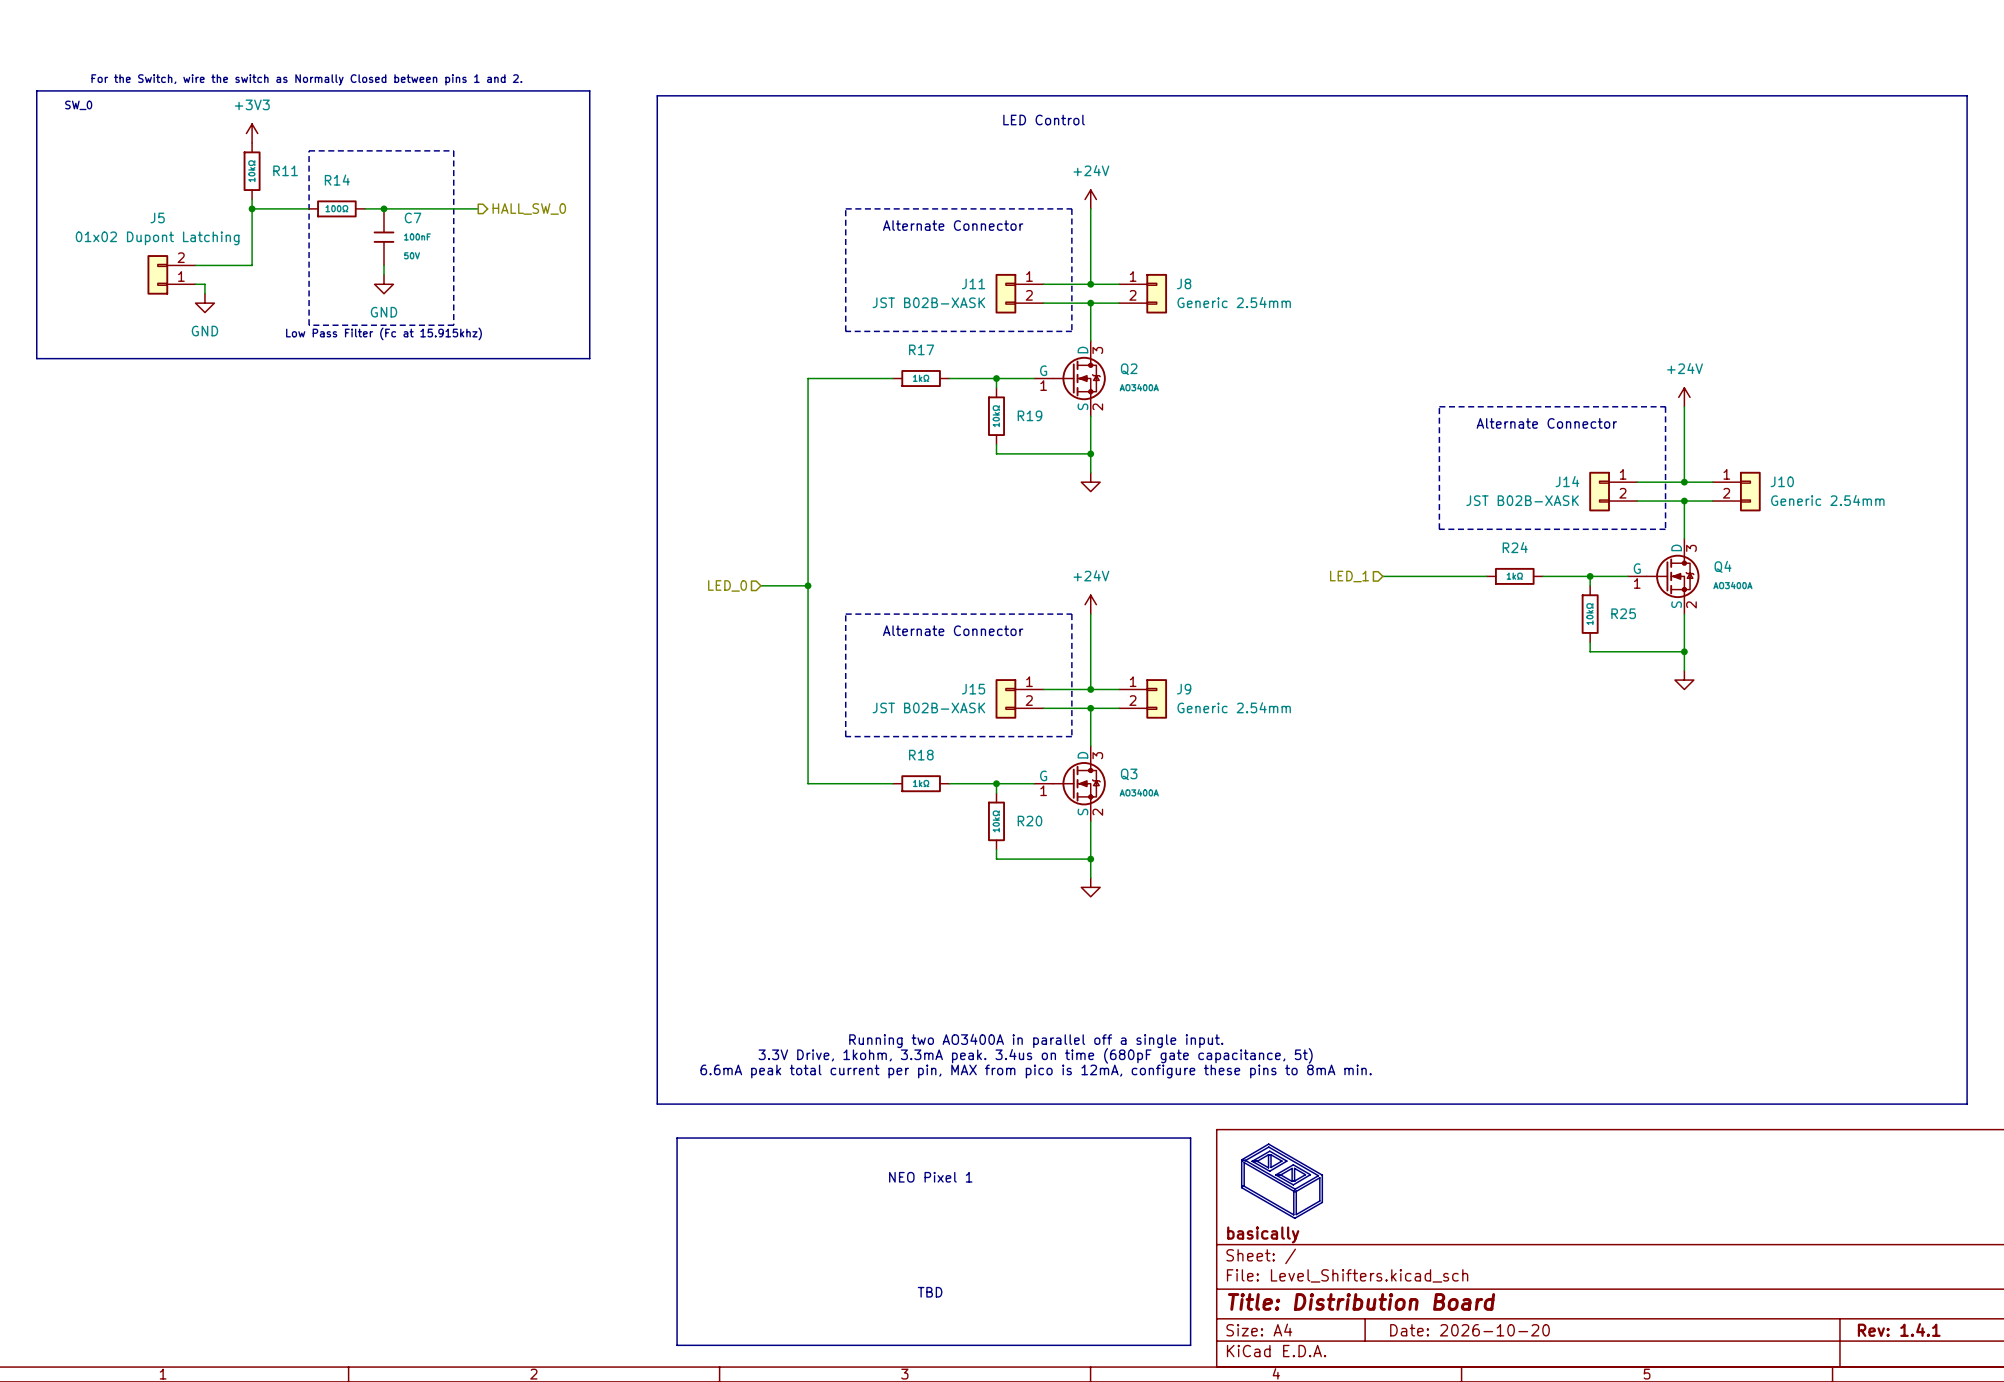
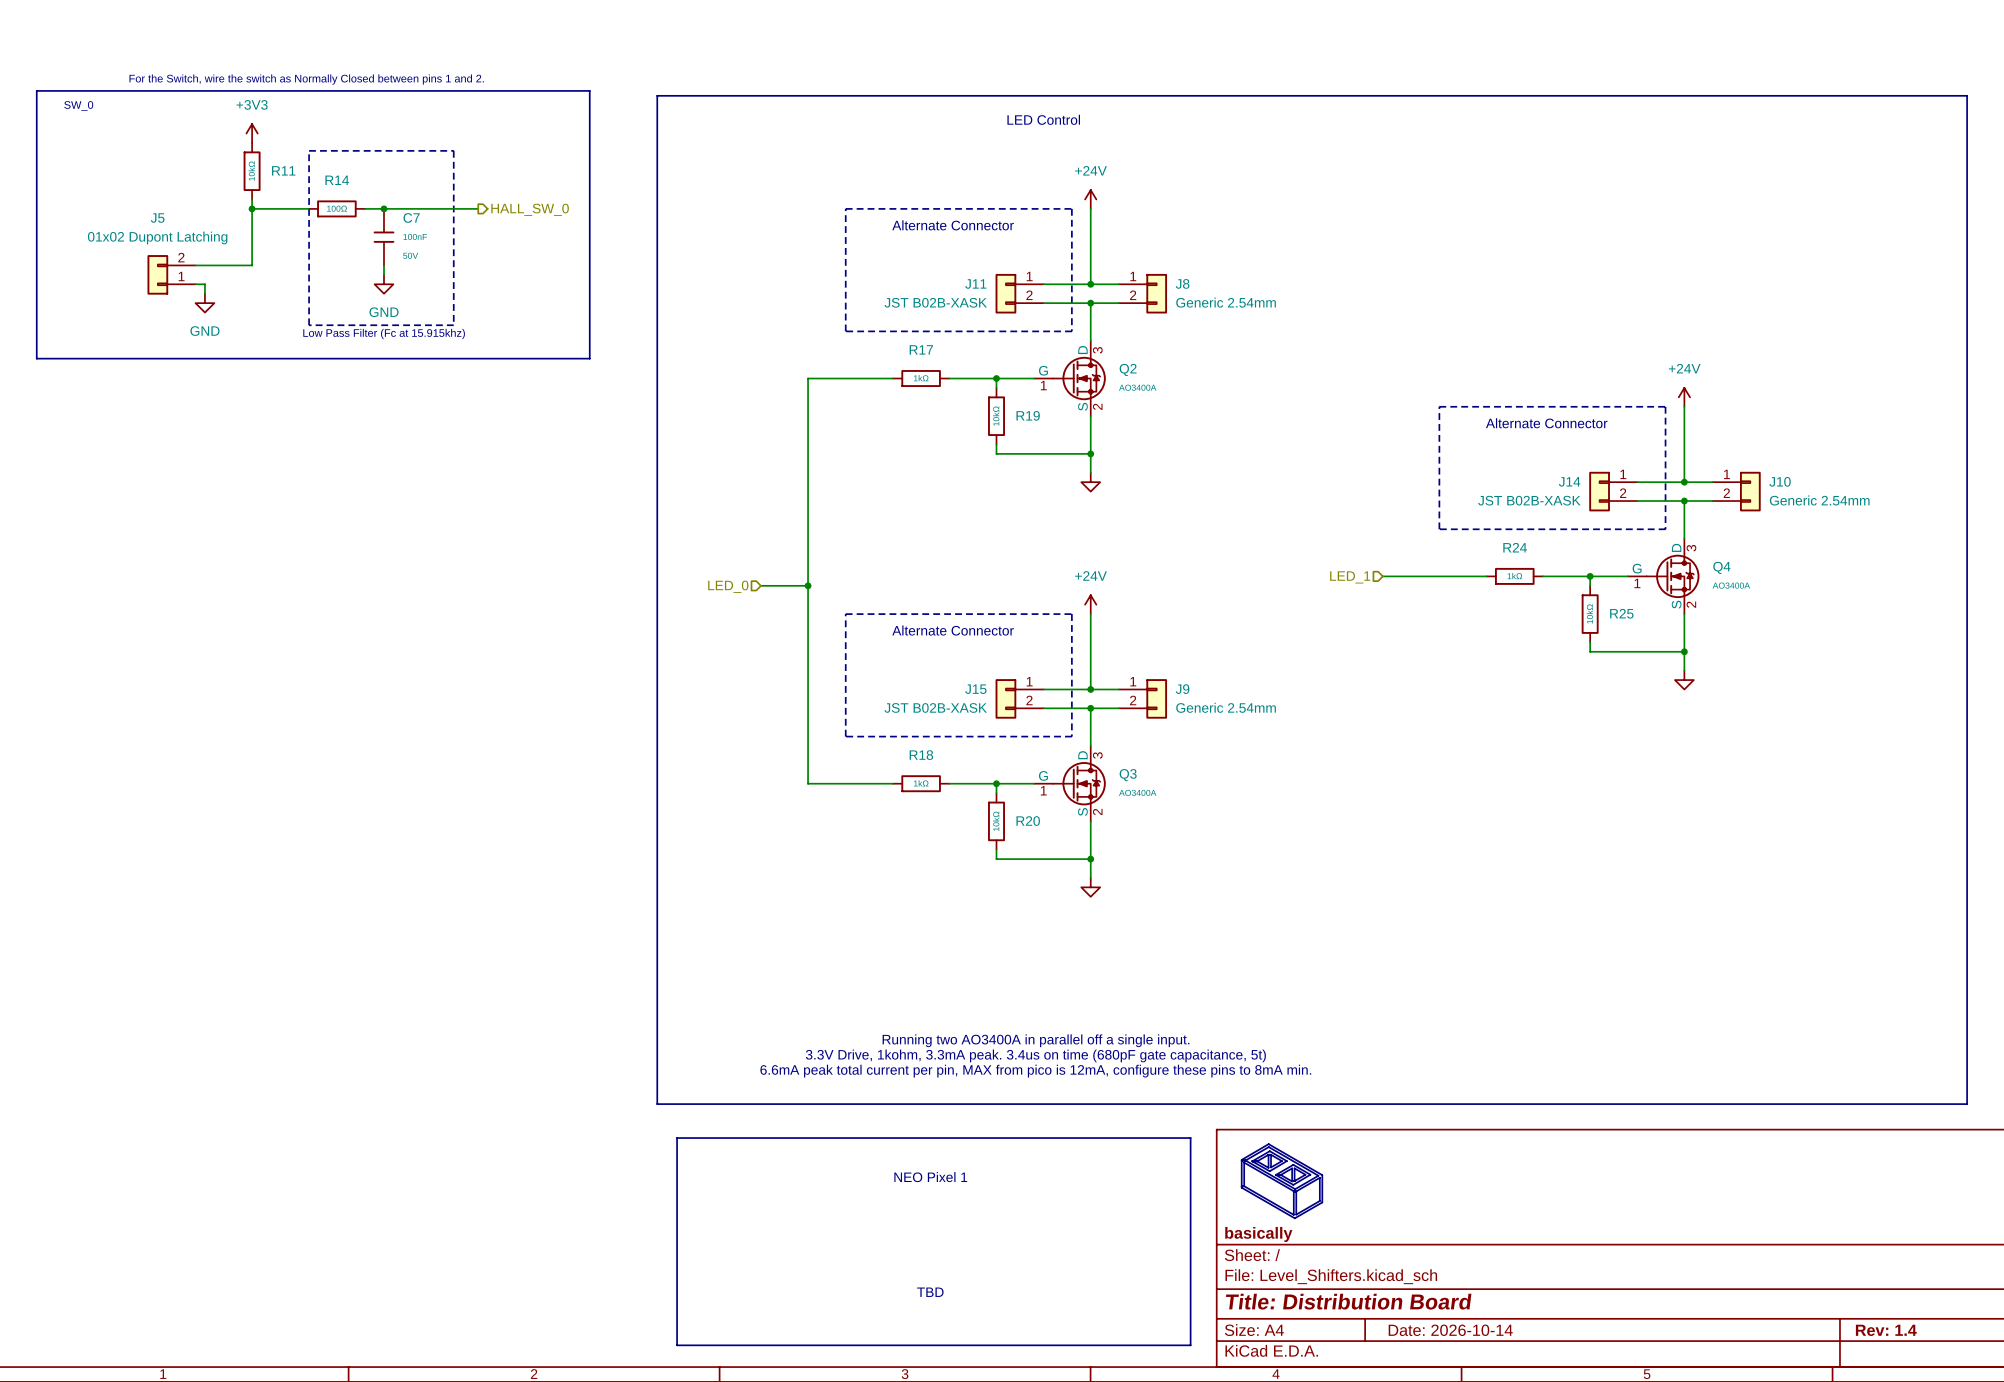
title block: Date: 2026-10-20 (1470, 1330) -> Date: 2026-10-14 (1450, 1330)
title block: Rev: 1.4.1 (1899, 1330) -> Rev: 1.4 (1886, 1330)

